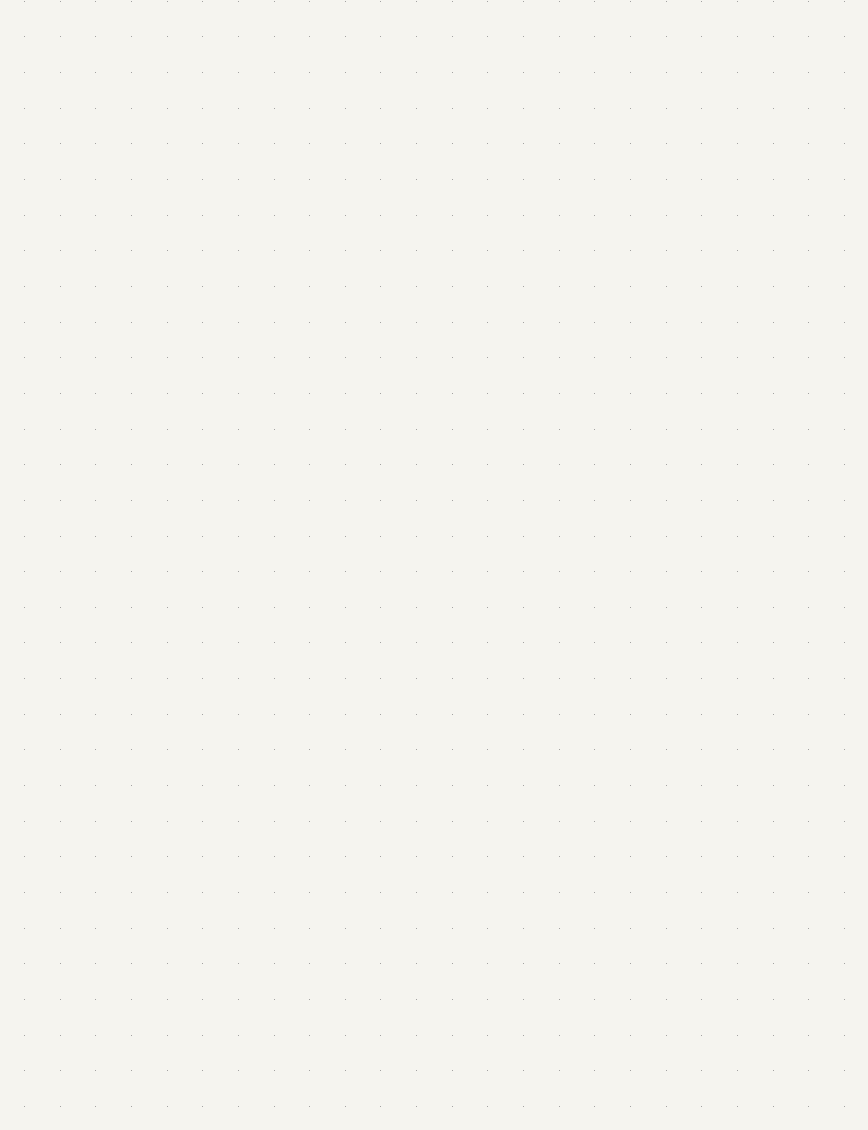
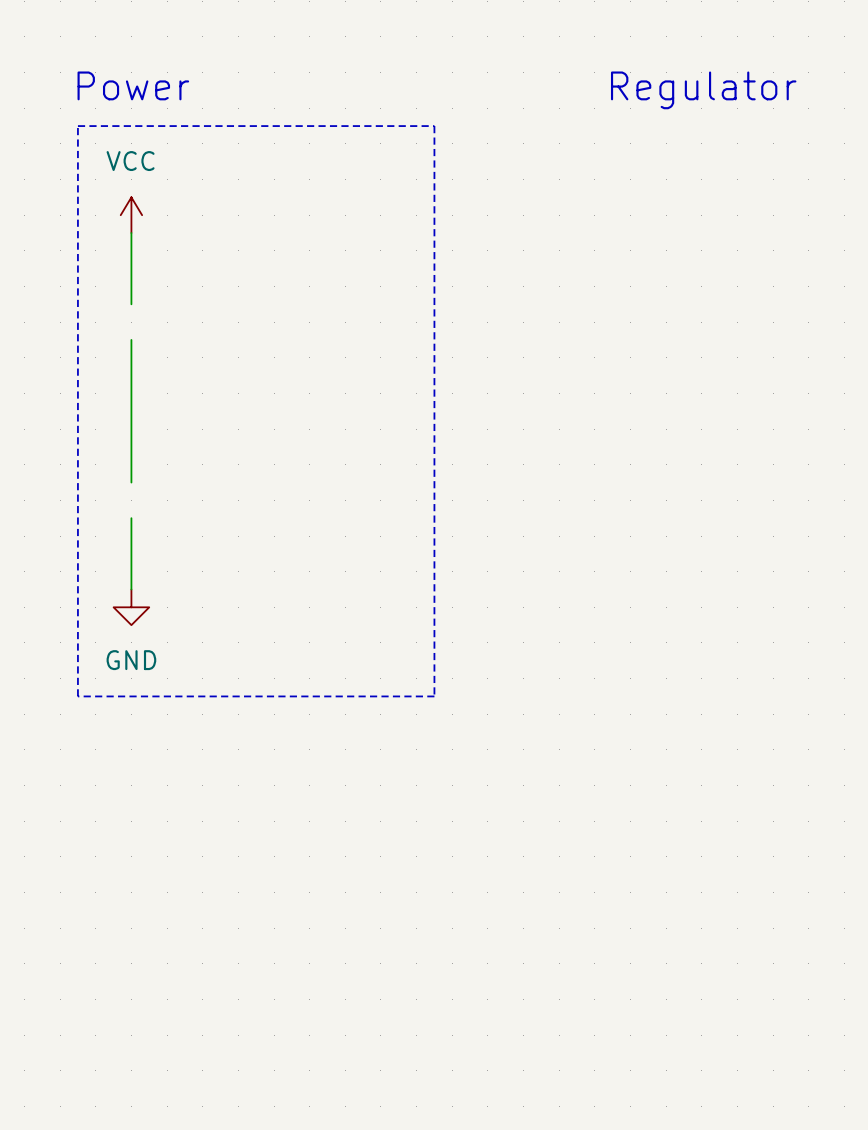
text: none -> Power (133, 85)
text: none -> Regulator (703, 90)
line: none -> (77, 126) (434, 126) (434, 696) (77, 696) (77, 126)
power symbol: none -> VCC (131, 215)
wire: none -> (131, 233) (131, 304)
wire: none -> (131, 339) (131, 482)
wire: none -> (131, 518) (131, 589)
power symbol: none -> GND (131, 607)

